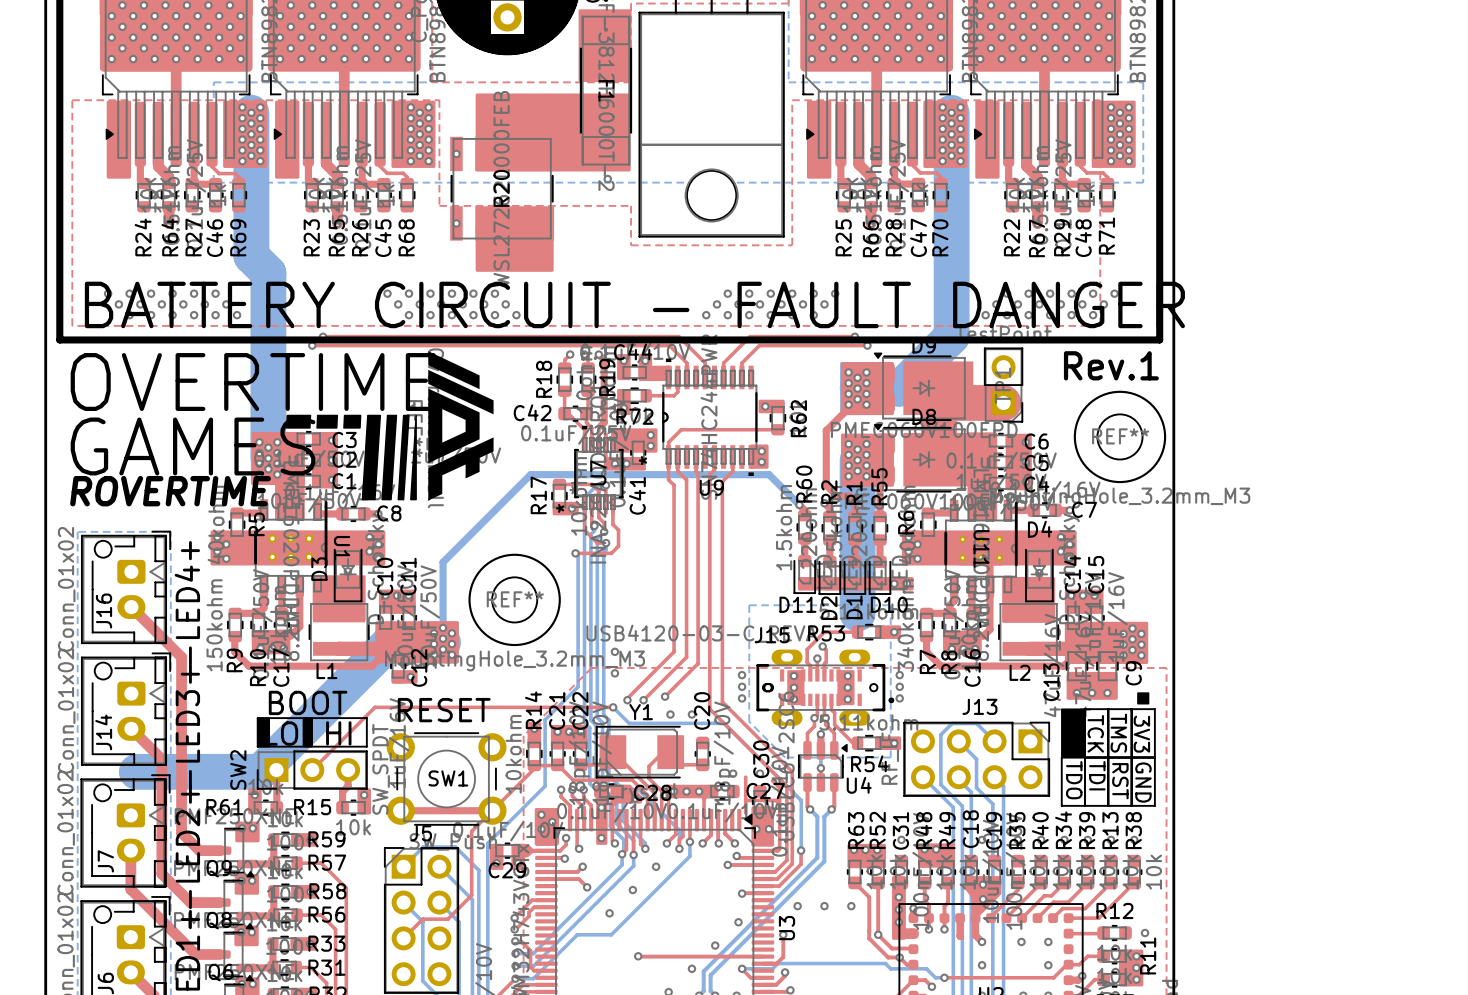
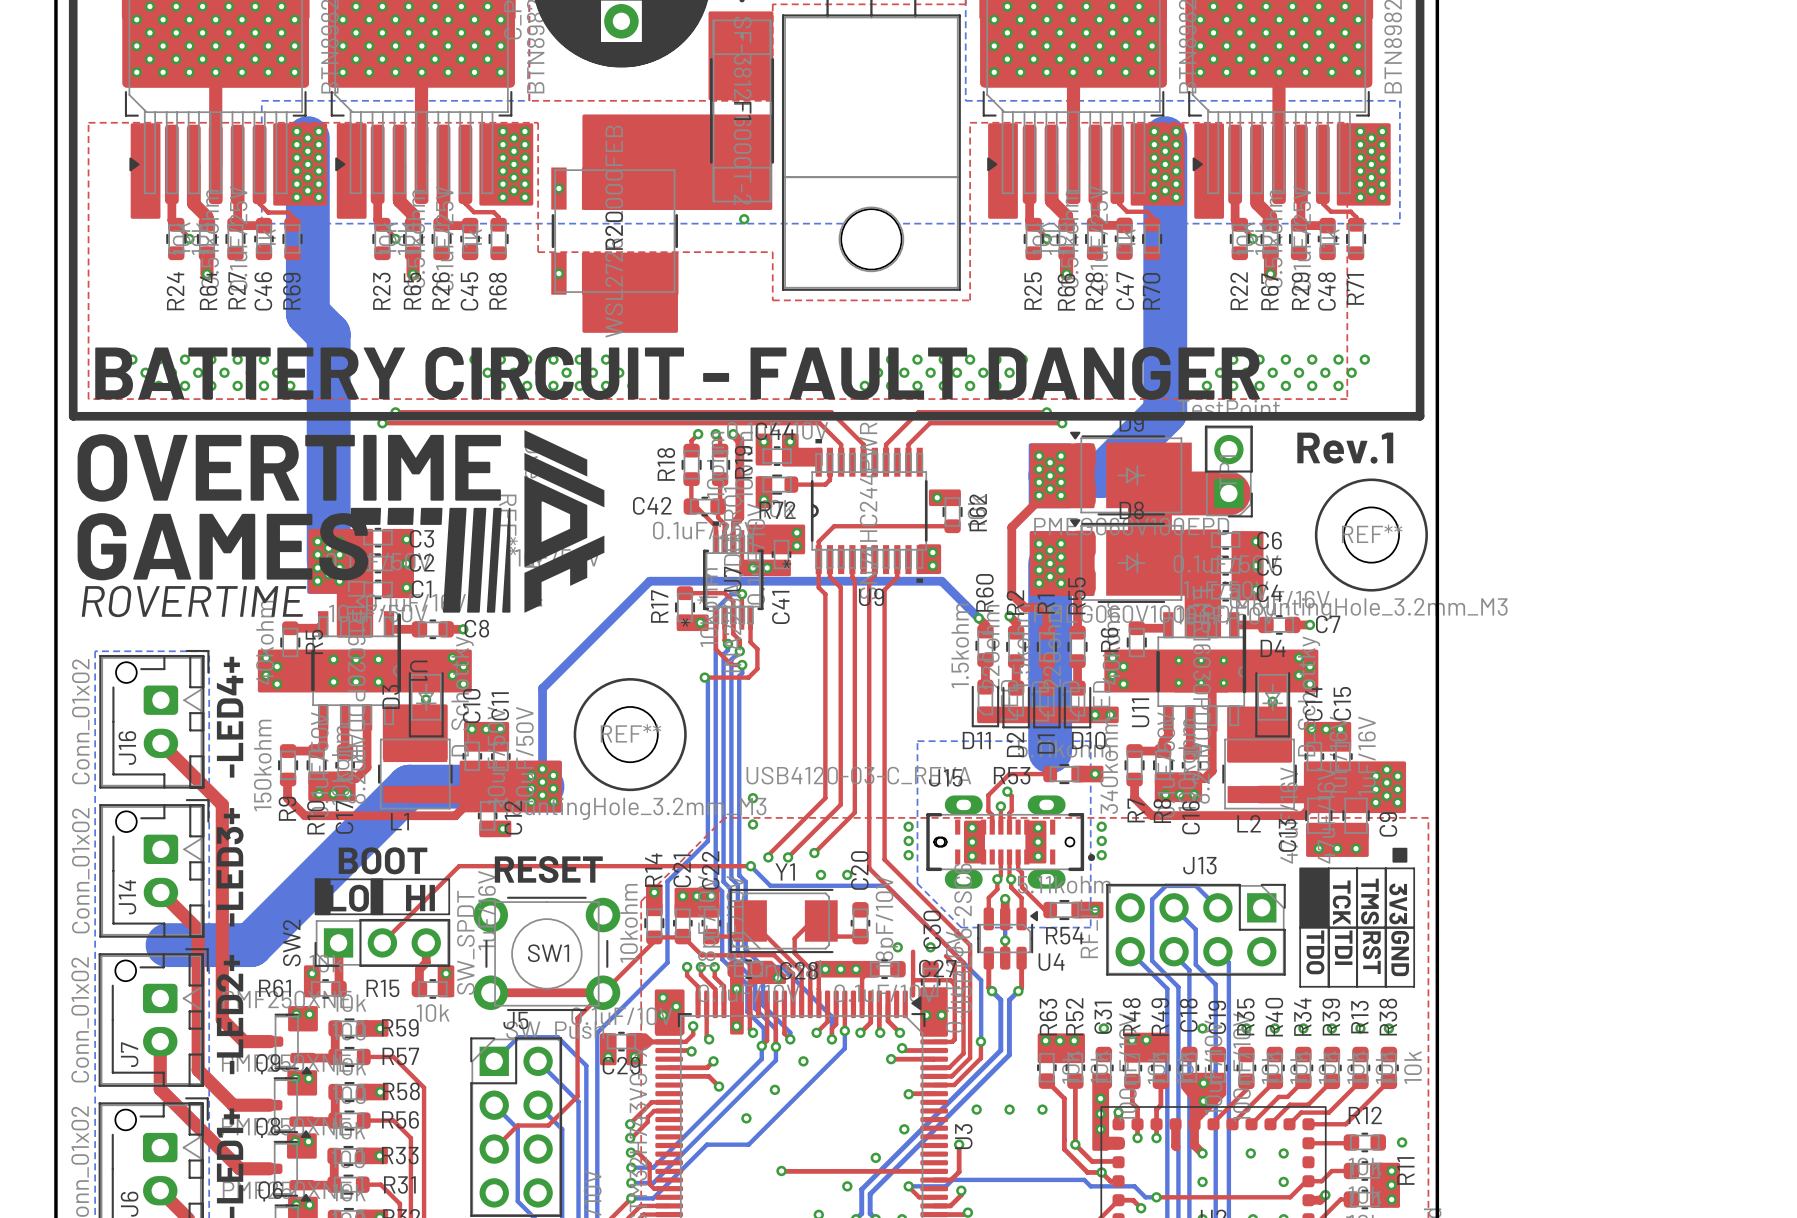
U11 name rotation: 0° (981, 548) -> 180° (1140, 712)
U11 name position: U11 (981, 548) -> U11 (1140, 712)
bottom track: (389, 642) (260, 771) (204, 771) -> (477, 786) (409, 786) (250, 945)

